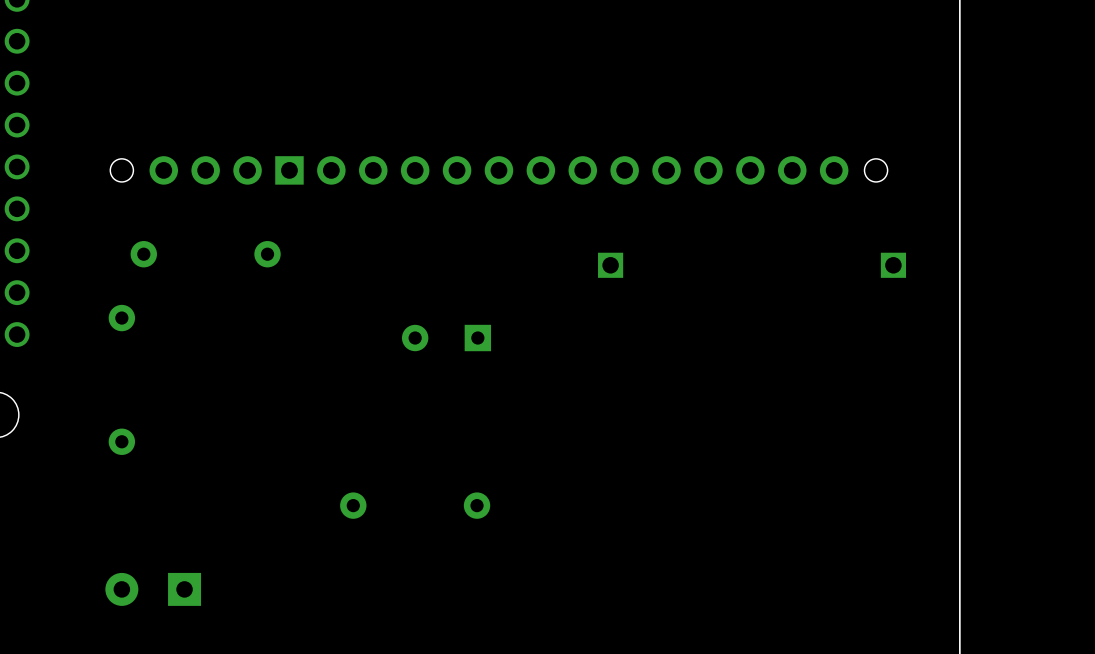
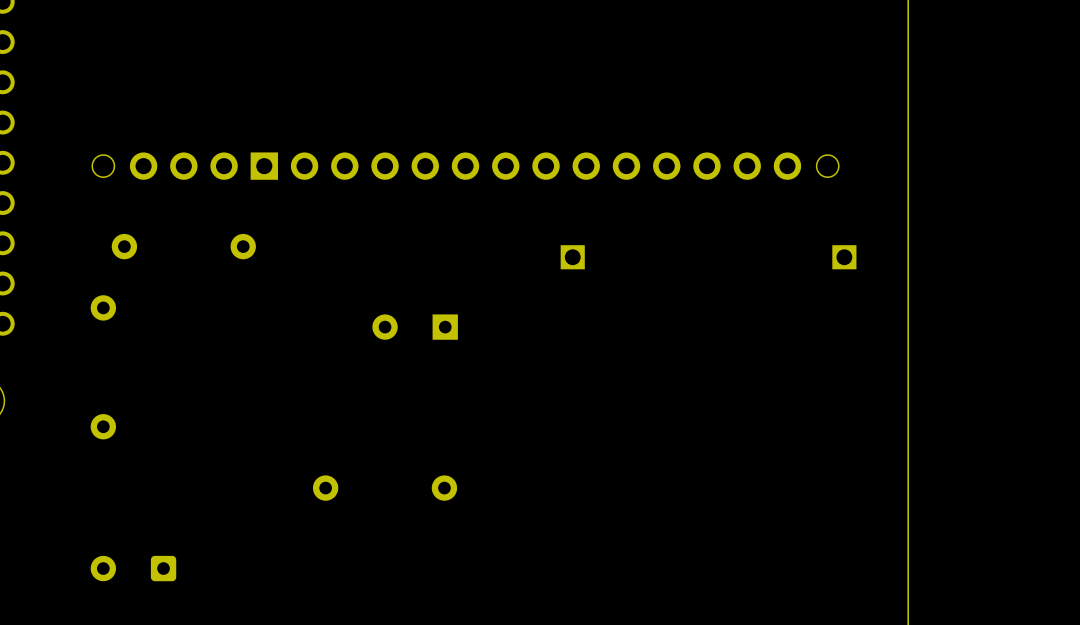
part footprint: [105, 572, 202, 606] -> [90, 555, 177, 582]

